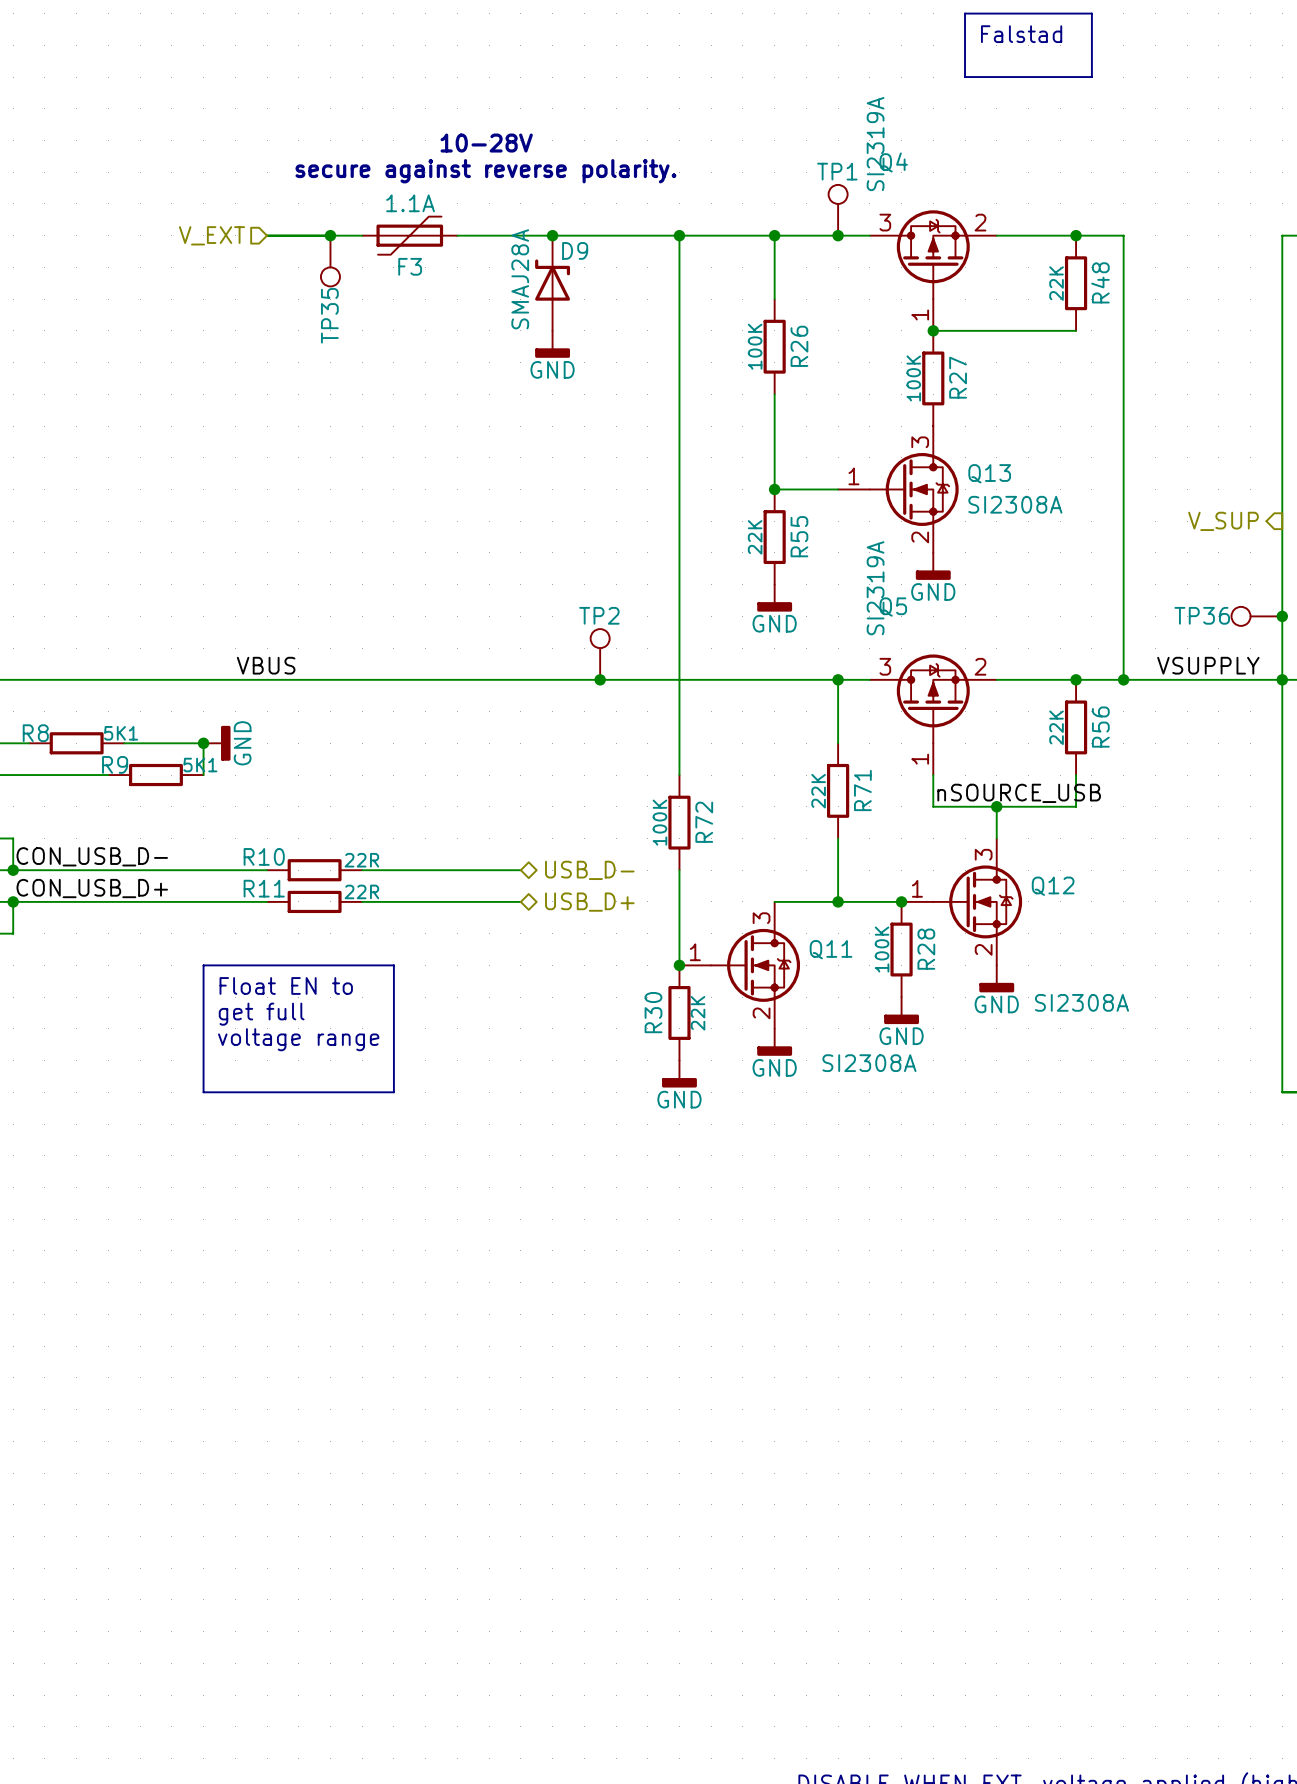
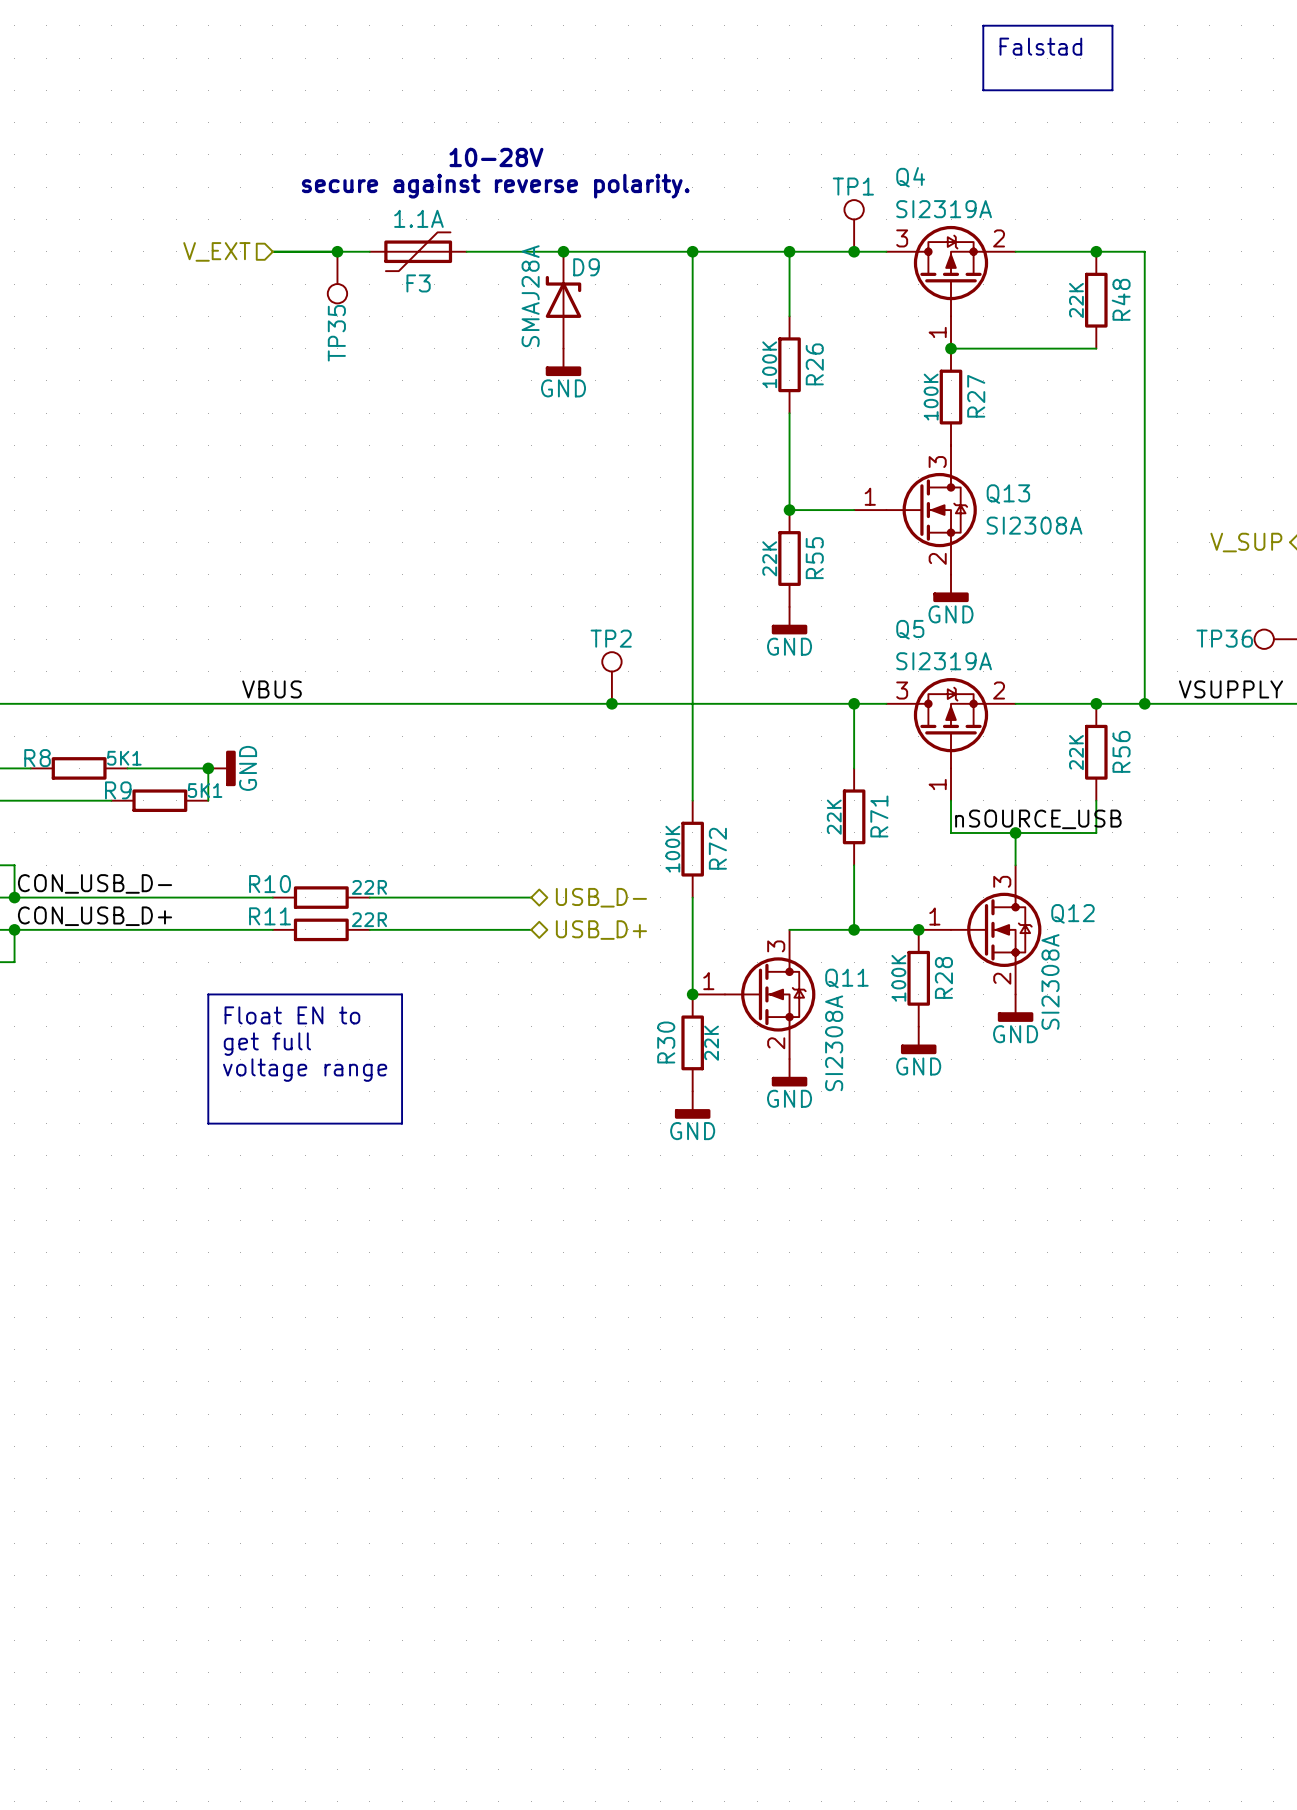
Q4 value rotation: 0° (875, 144) -> 90° clockwise (944, 209)
Q5 value rotation: 0° (875, 588) -> 90° clockwise (944, 661)
Q12 value rotation: 0° (1081, 1002) -> 90° counterclockwise (1050, 981)
Q11 value rotation: 0° (869, 1063) -> 90° counterclockwise (834, 1043)

